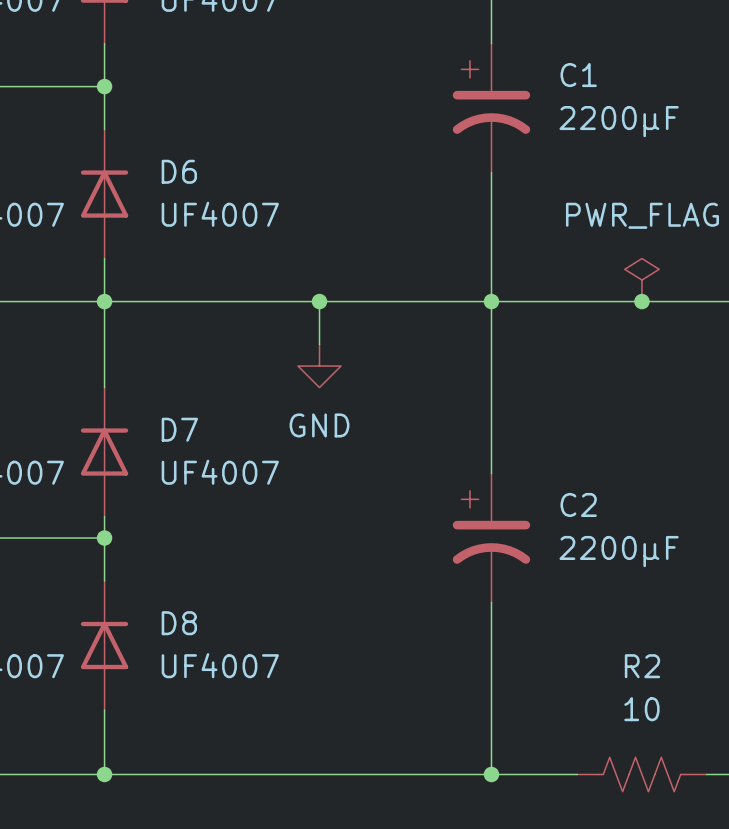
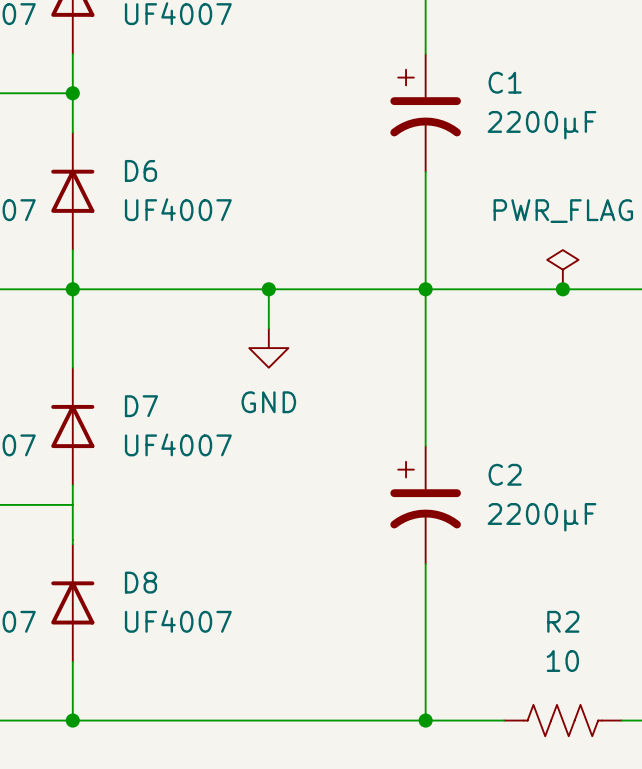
junction: (104, 538) -> none

